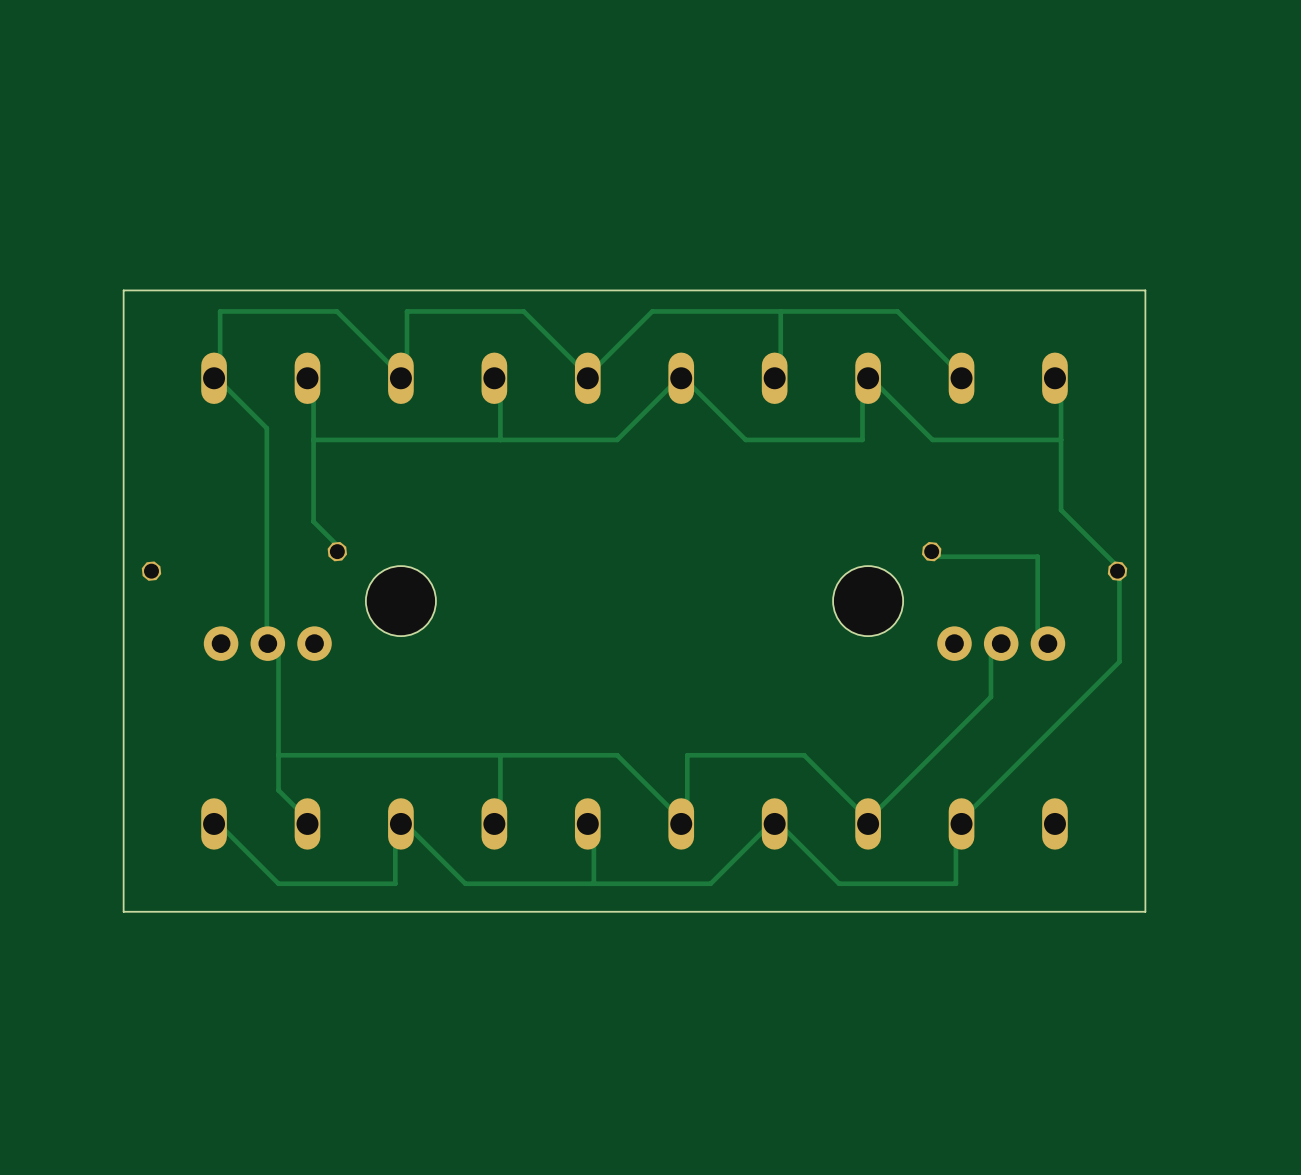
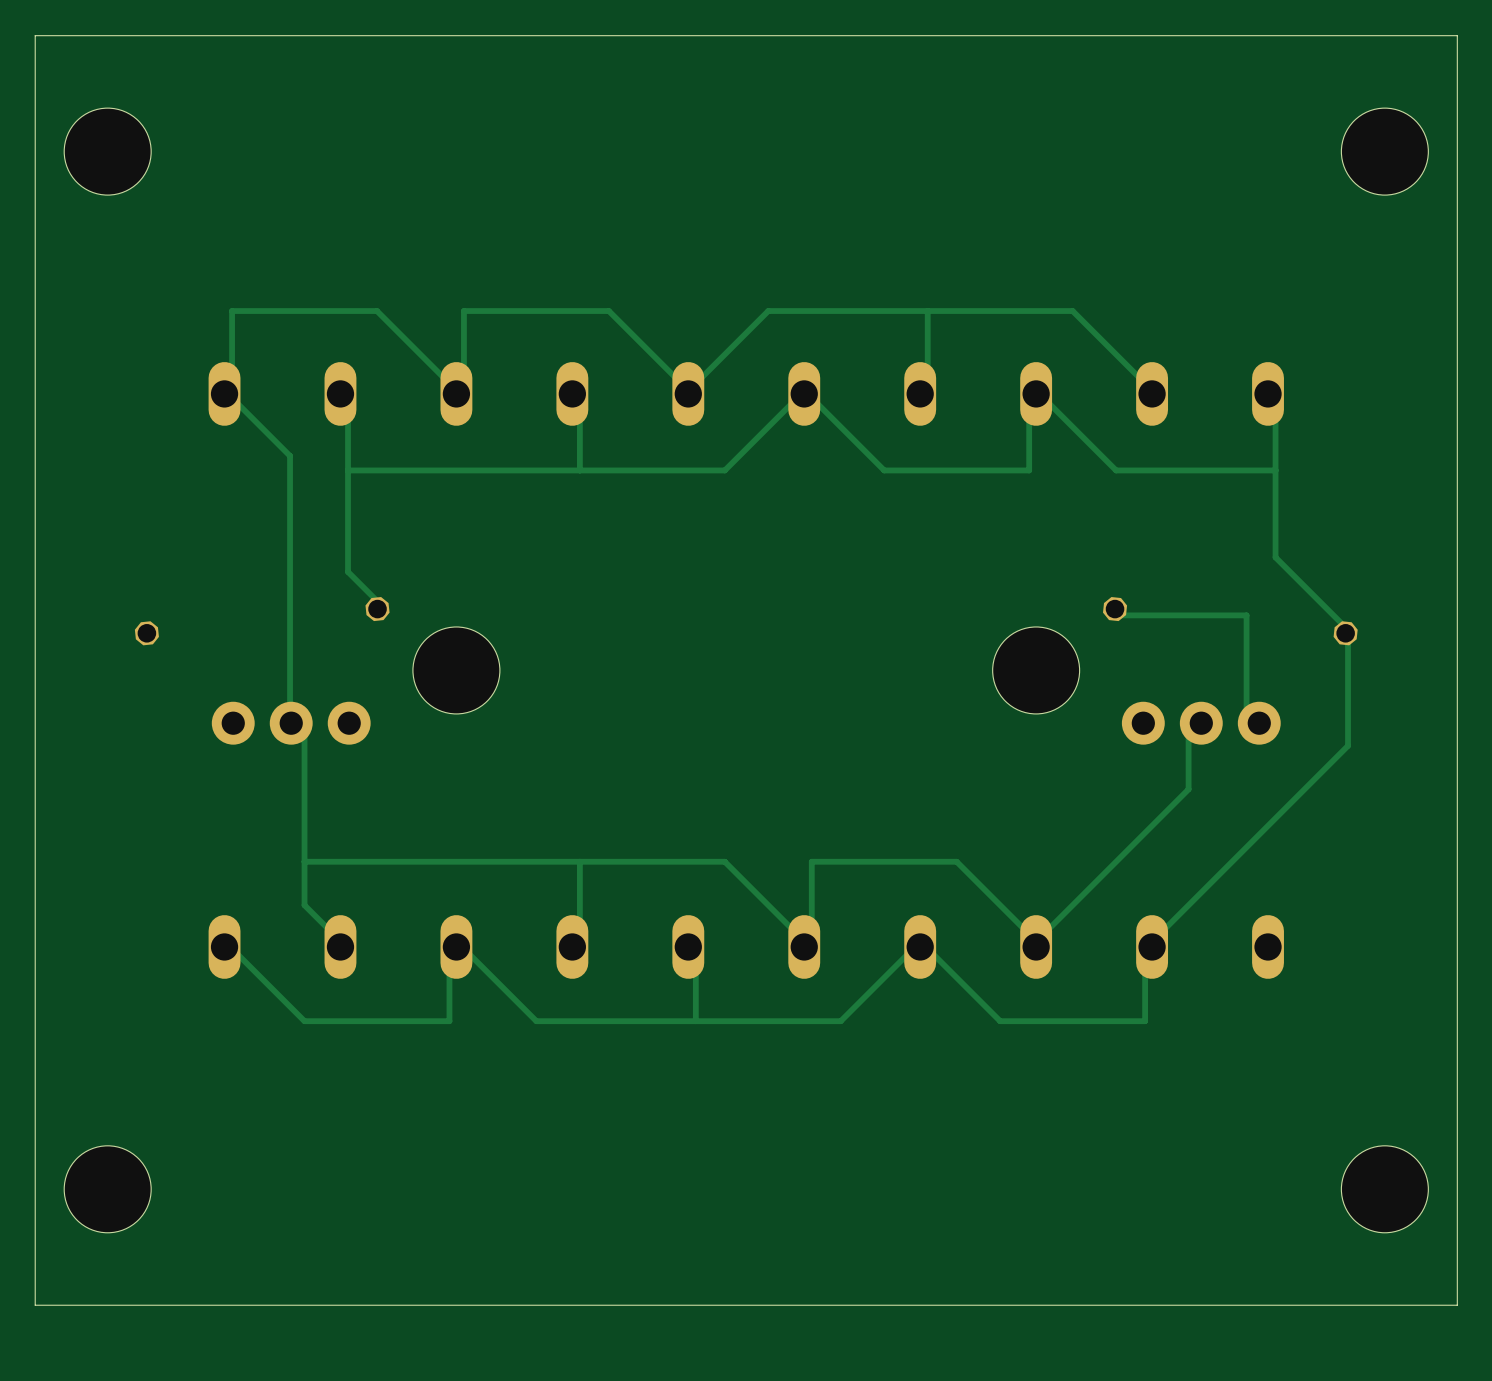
hole: none -> (107, 151)
hole: none -> (1384, 151)
board edge: (1145, 290) (123, 290) (123, 911) (1145, 911) (1145, 290) -> (1457, 35) (1457, 1305) (35, 1305) (35, 35) (1457, 35)
hole: none -> (107, 1189)
hole: none -> (1384, 1189)

